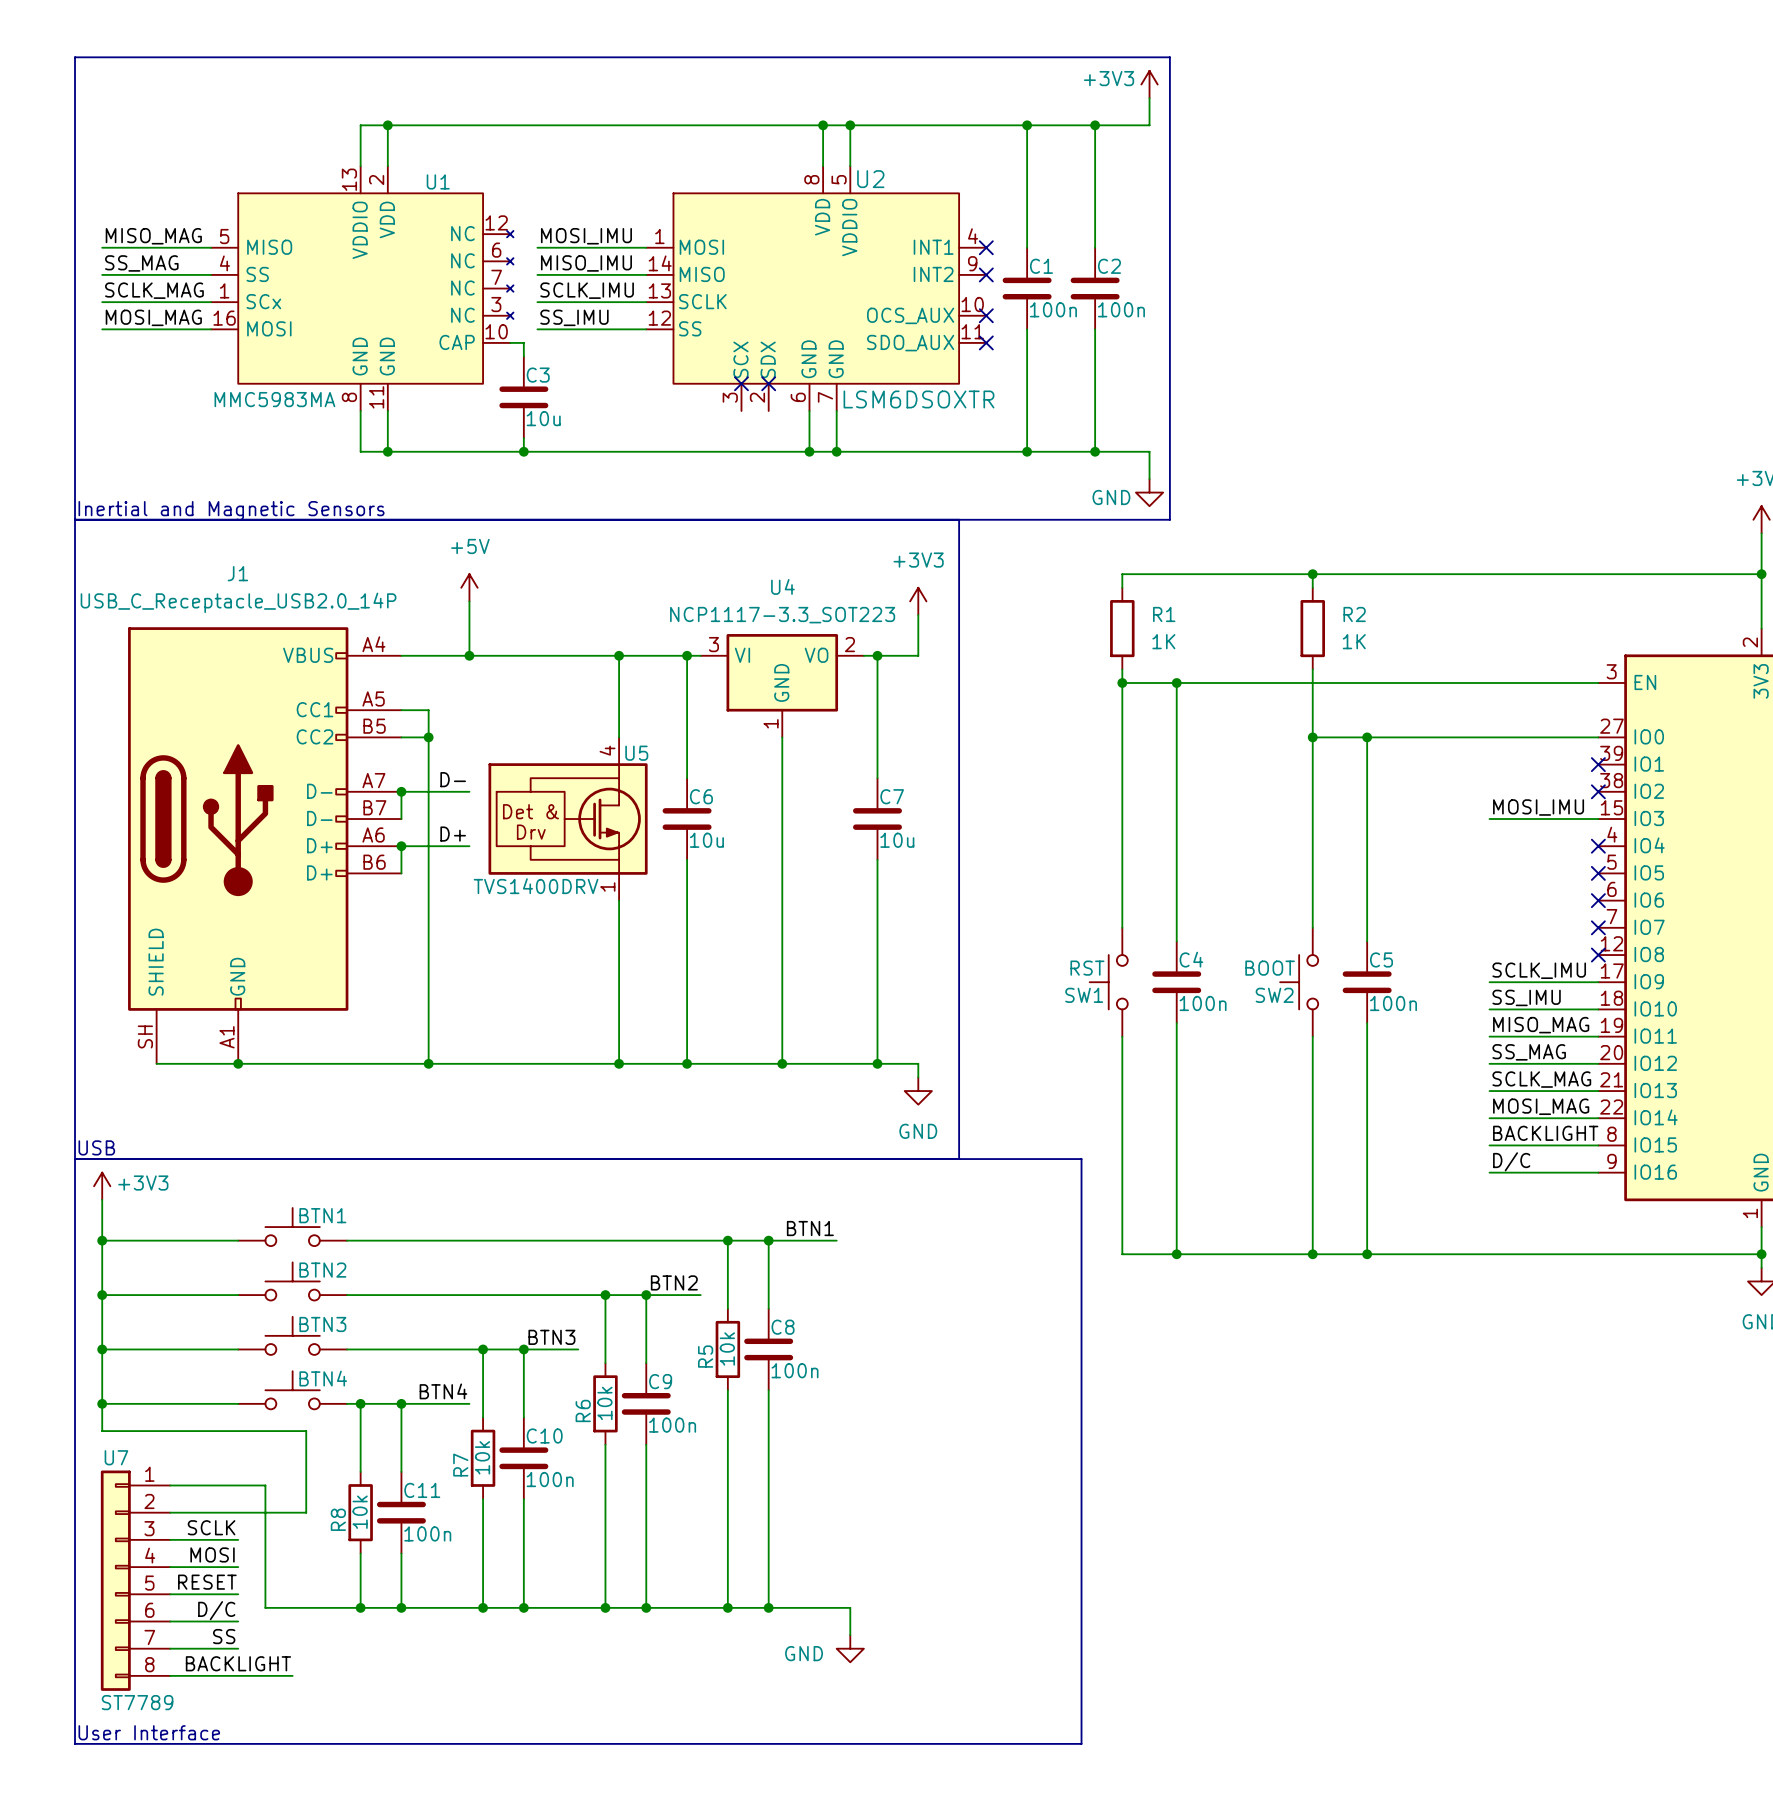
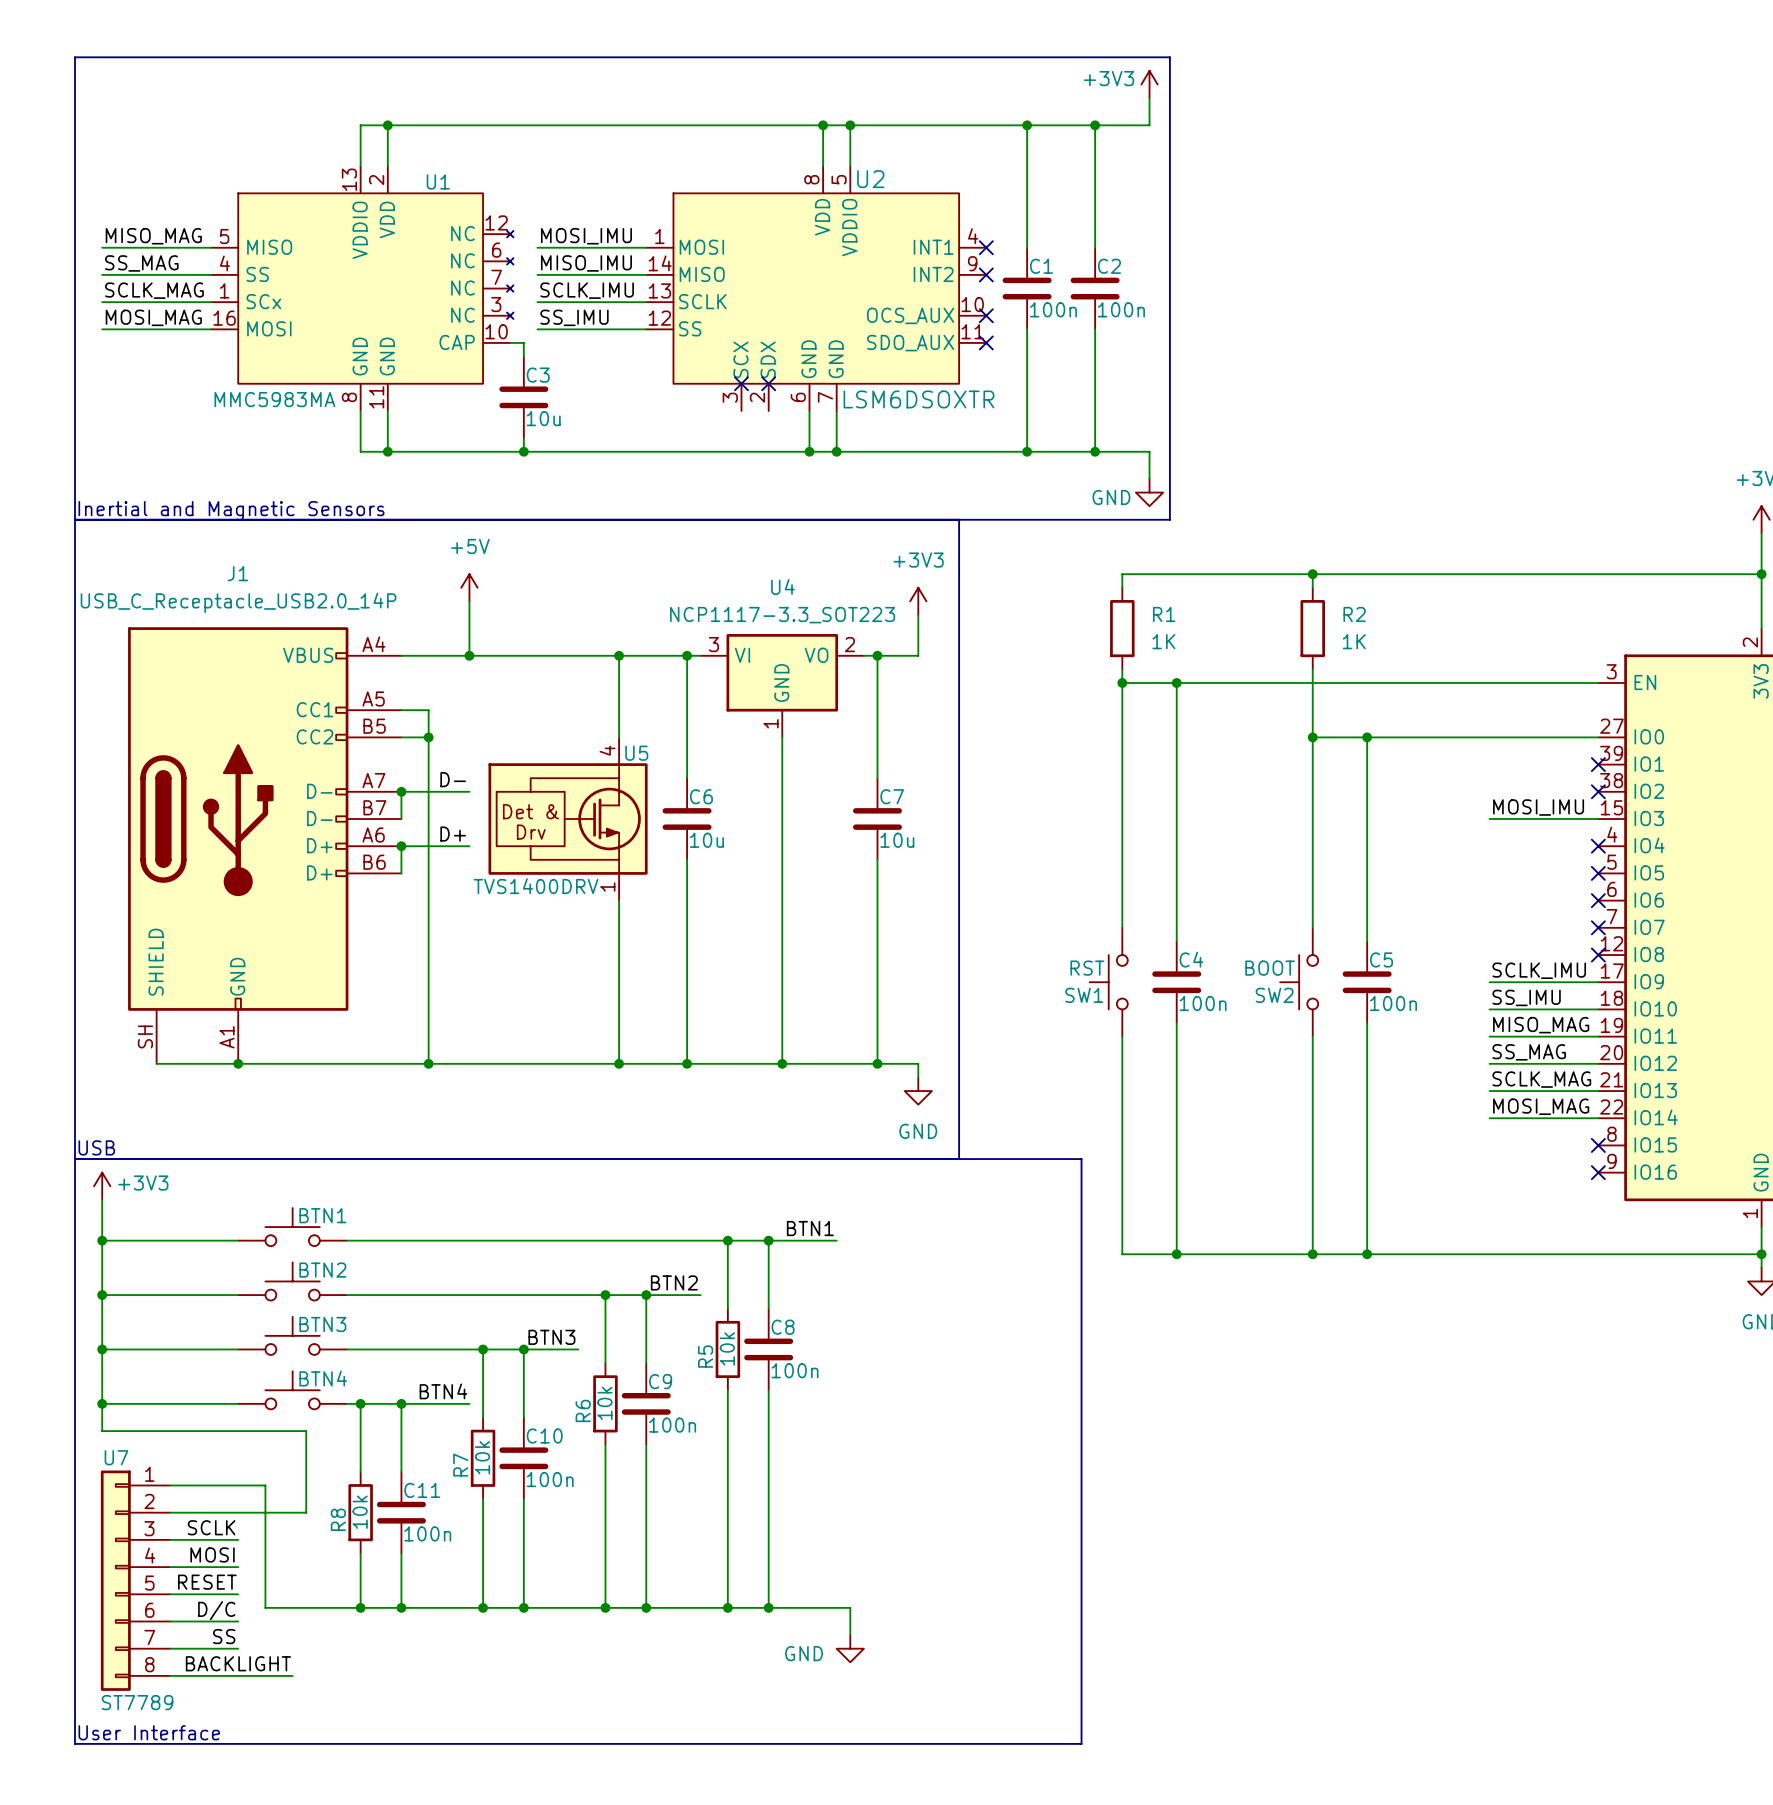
label: BACKLIGHT (1545, 1133) -> none
wire: (1489, 1145) (1598, 1145) -> none
no-connect mark: none -> (1598, 1145)
label: D/C (1511, 1161) -> none
wire: (1489, 1172) (1598, 1172) -> none
no-connect mark: none -> (1598, 1172)

